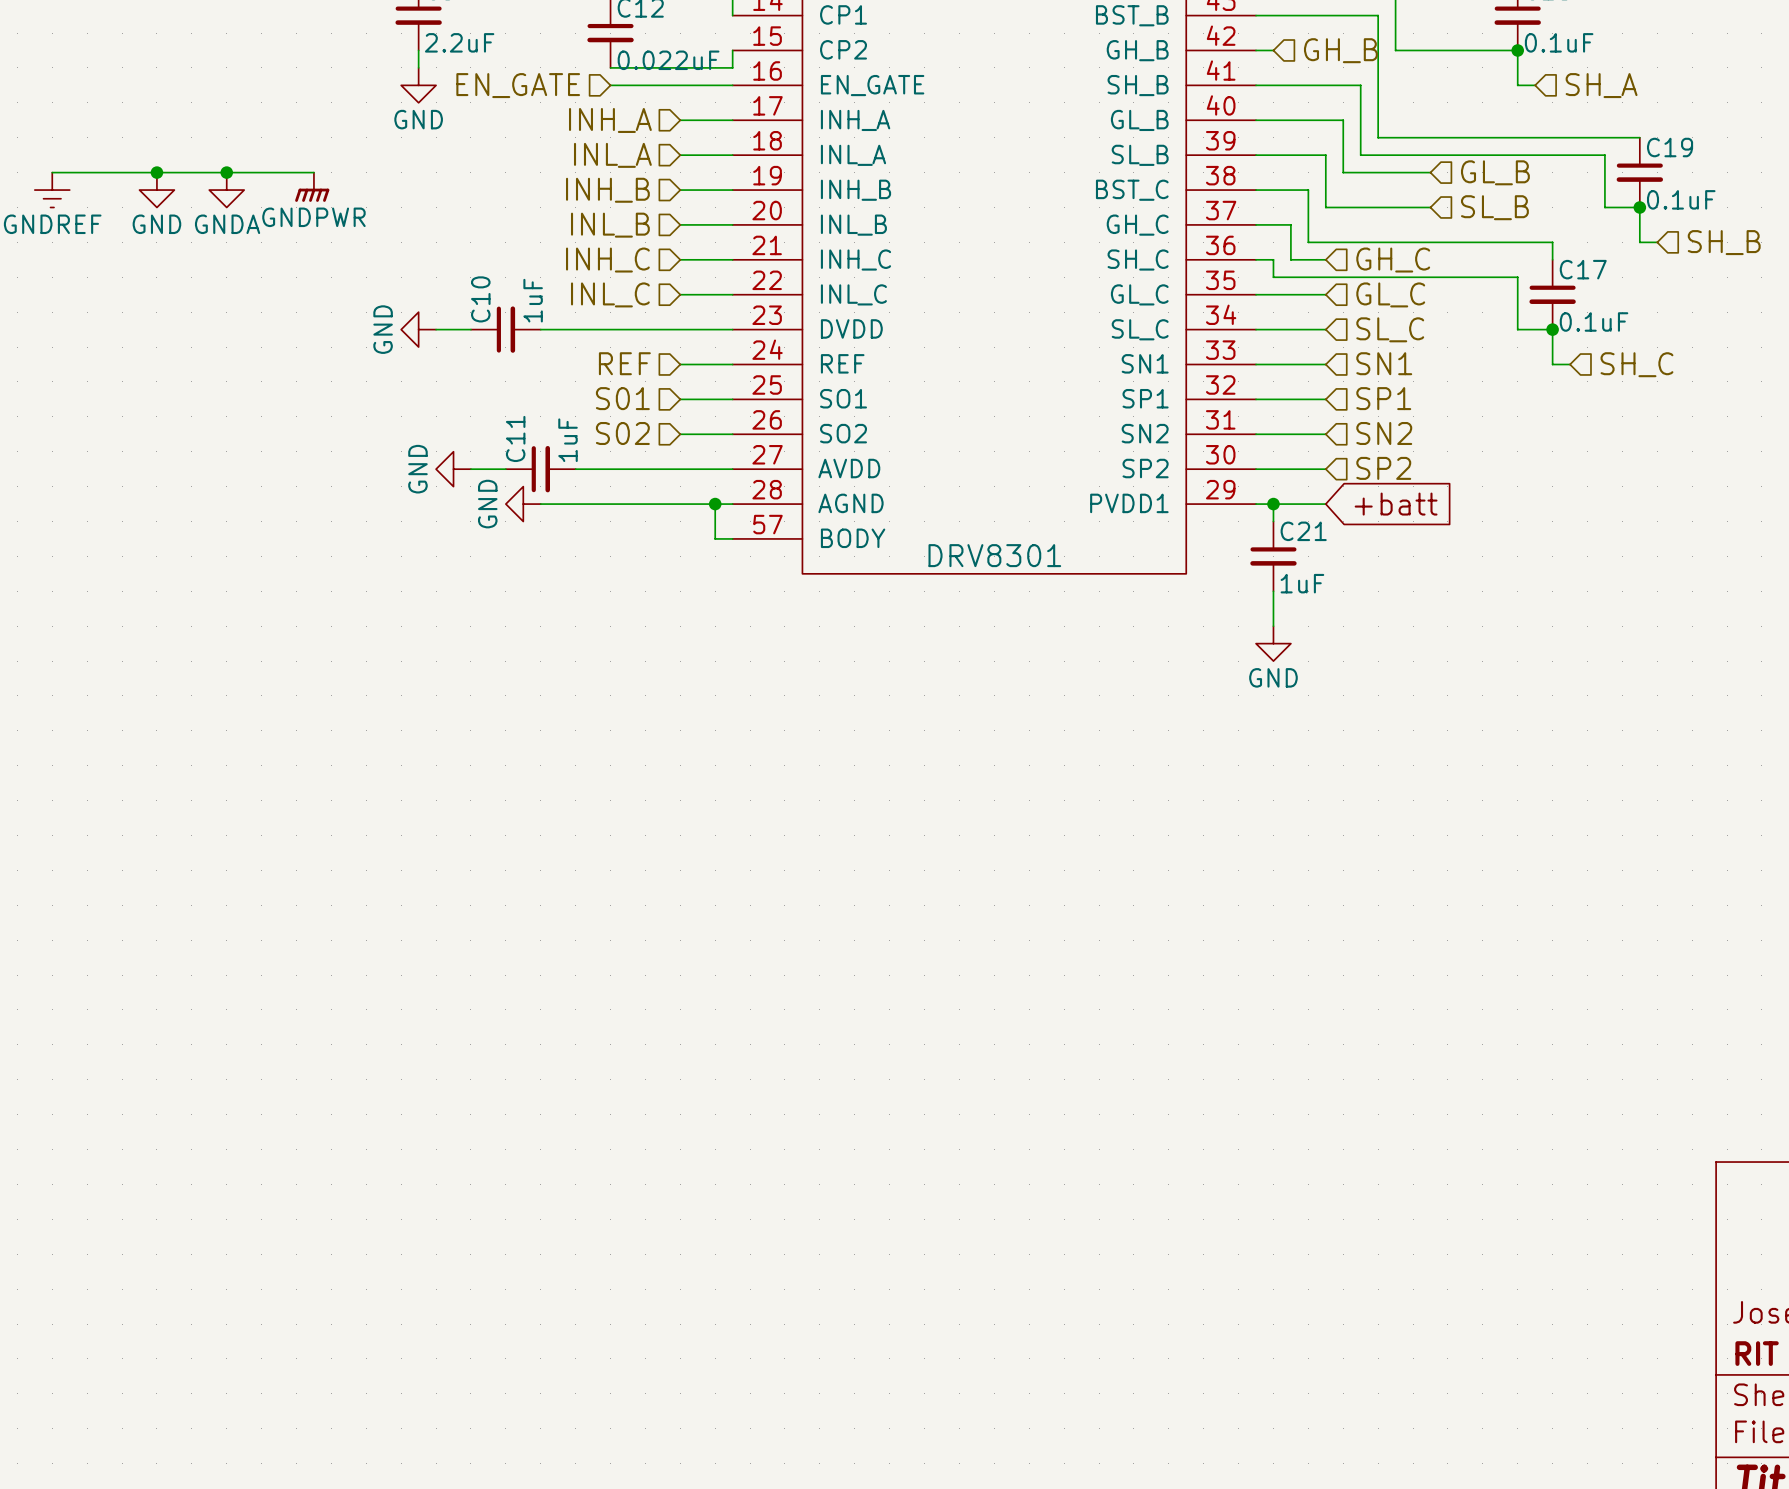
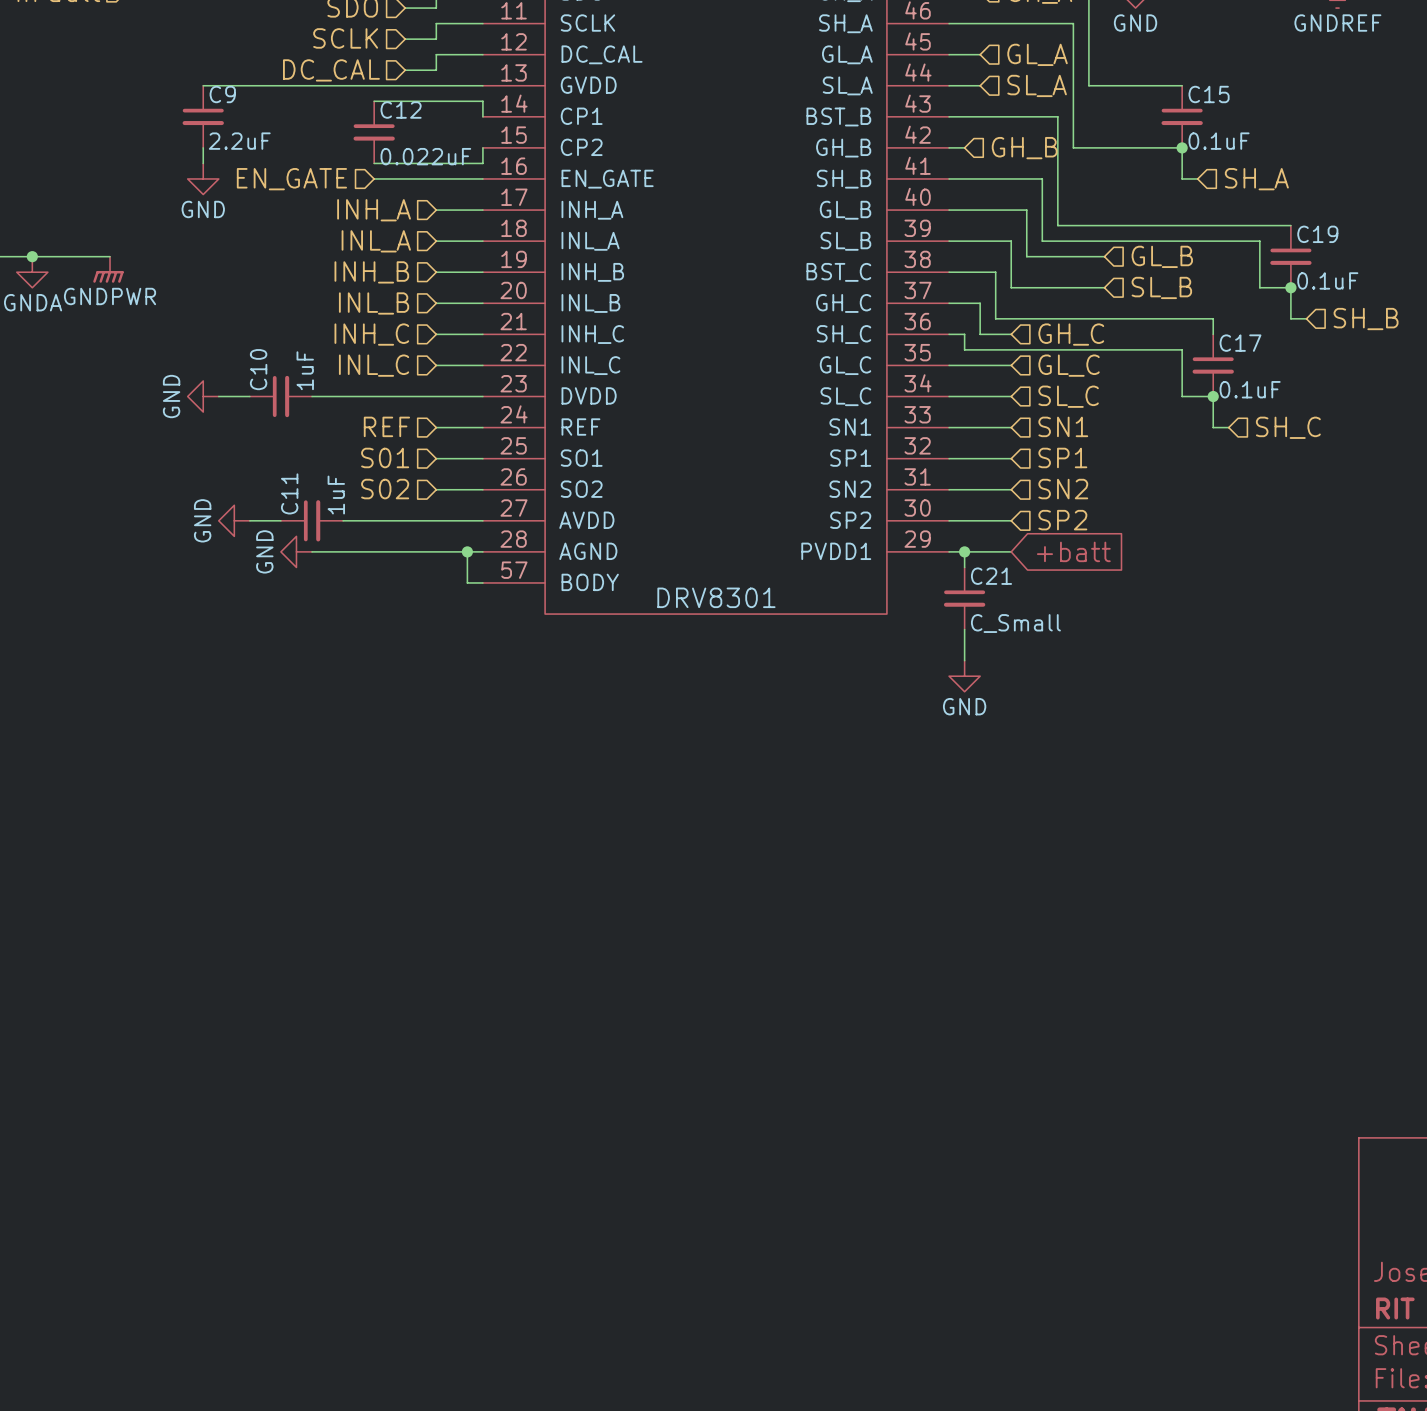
C21 value: 1uF (1302, 583) -> C_Small (1015, 623)

